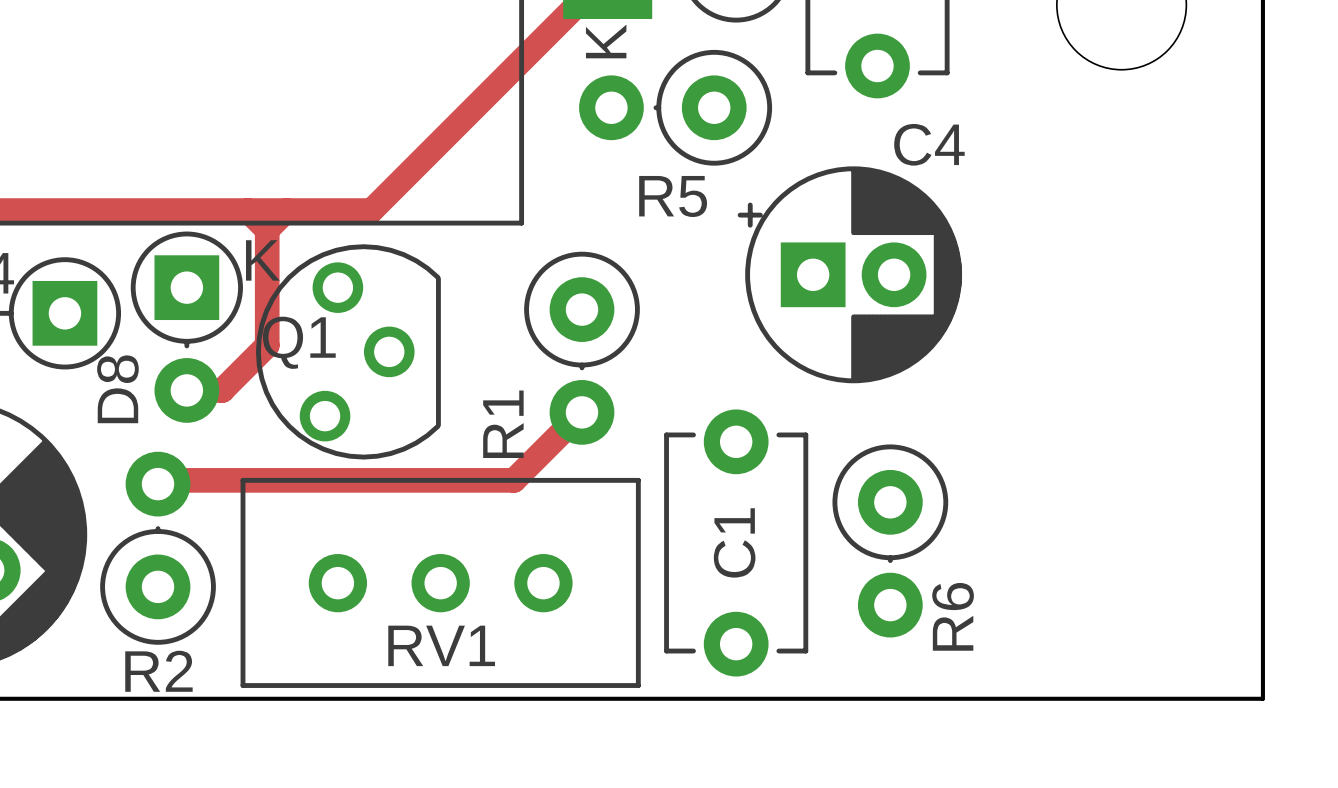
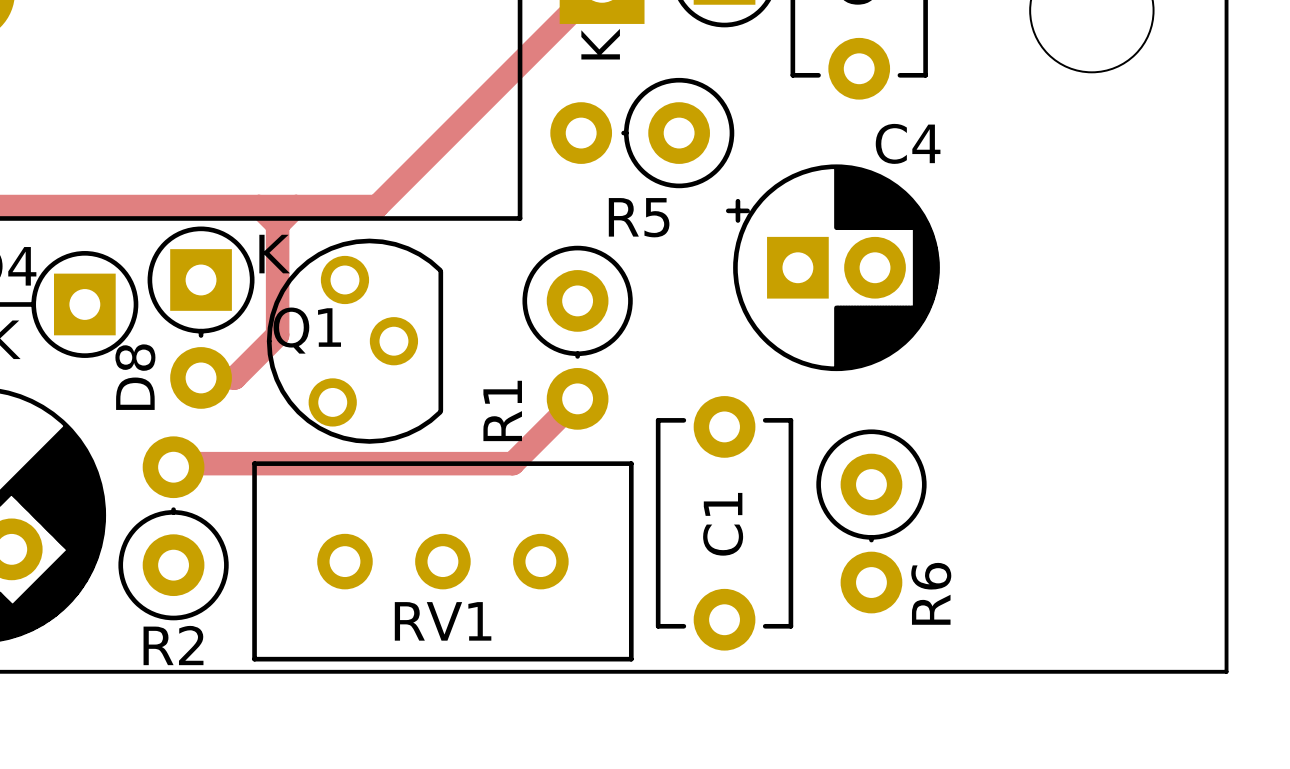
R5 position: (675, 107) -> (642, 133)

